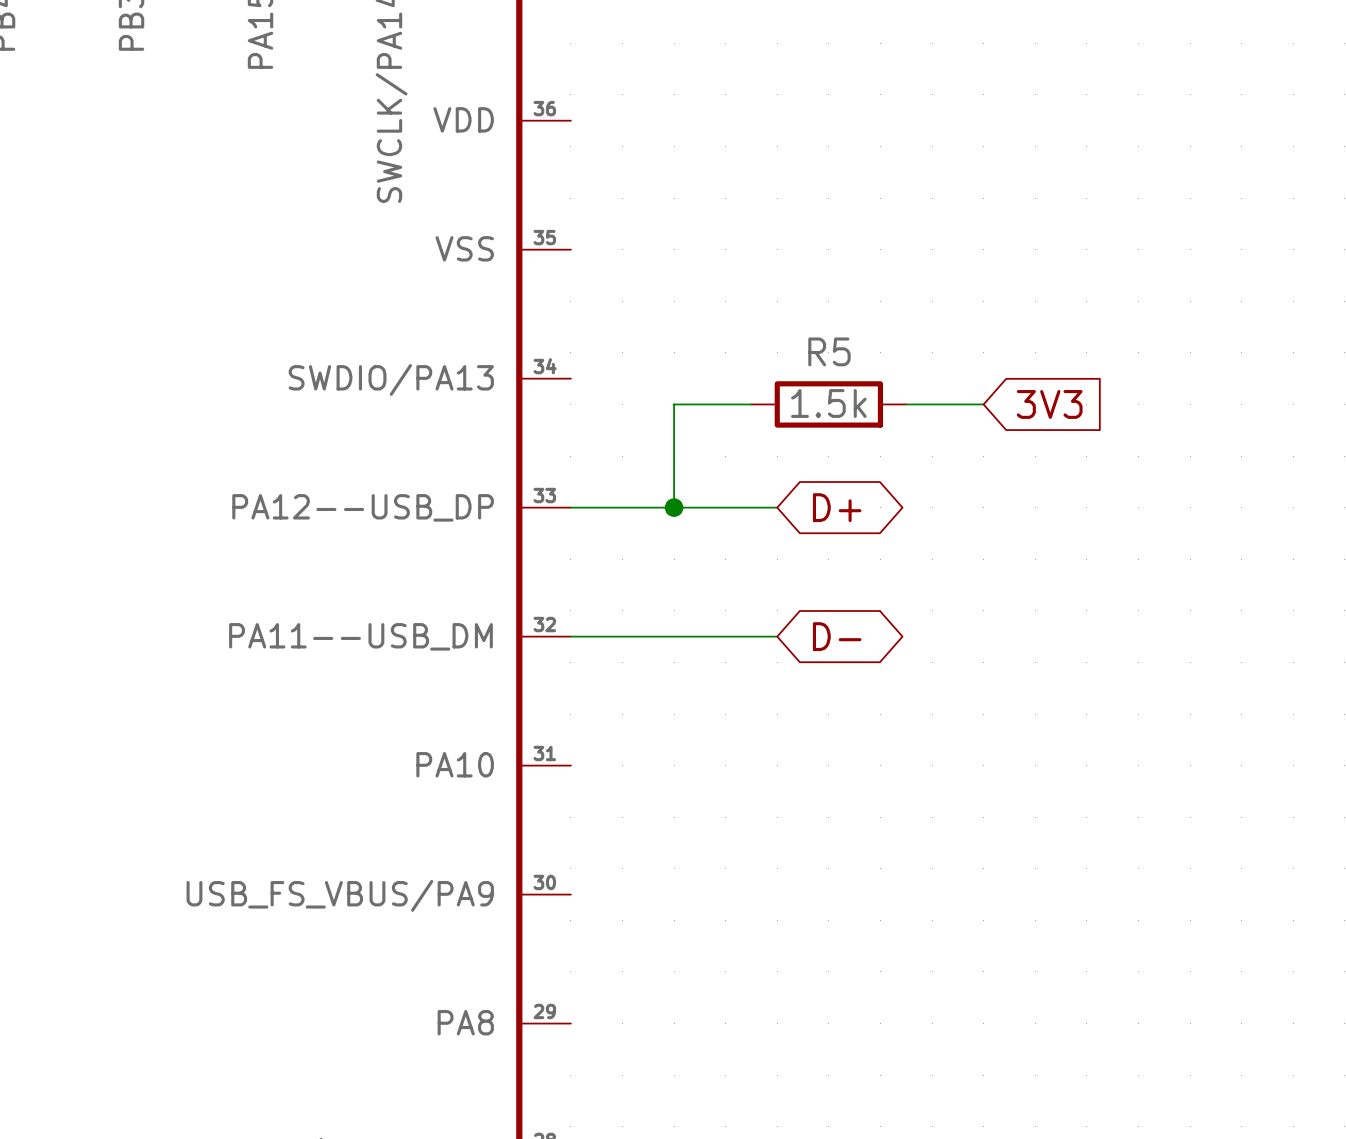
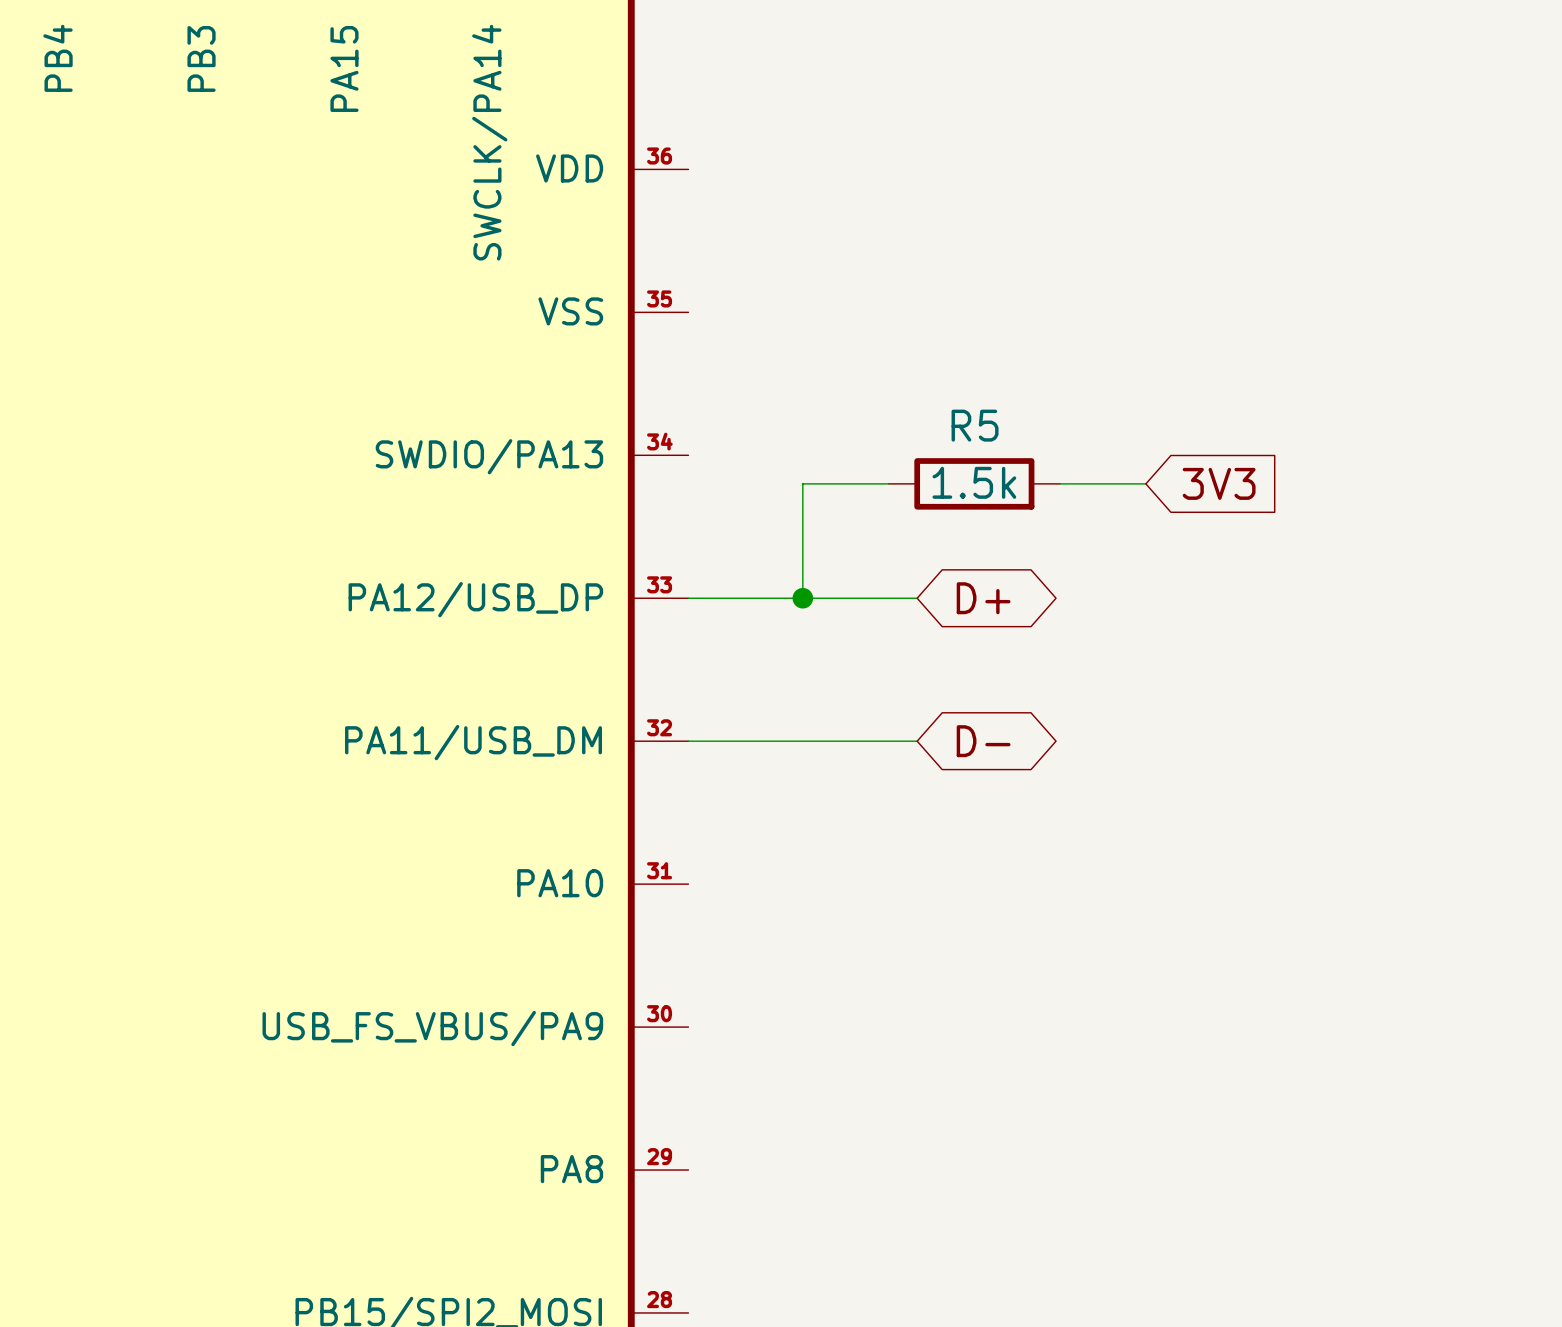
part pin name: PA12--USB_DP (363, 507) -> PA12/USB_DP (475, 599)
part pin name: PA11--USB_DM (360, 636) -> PA11/USB_DM (473, 742)

